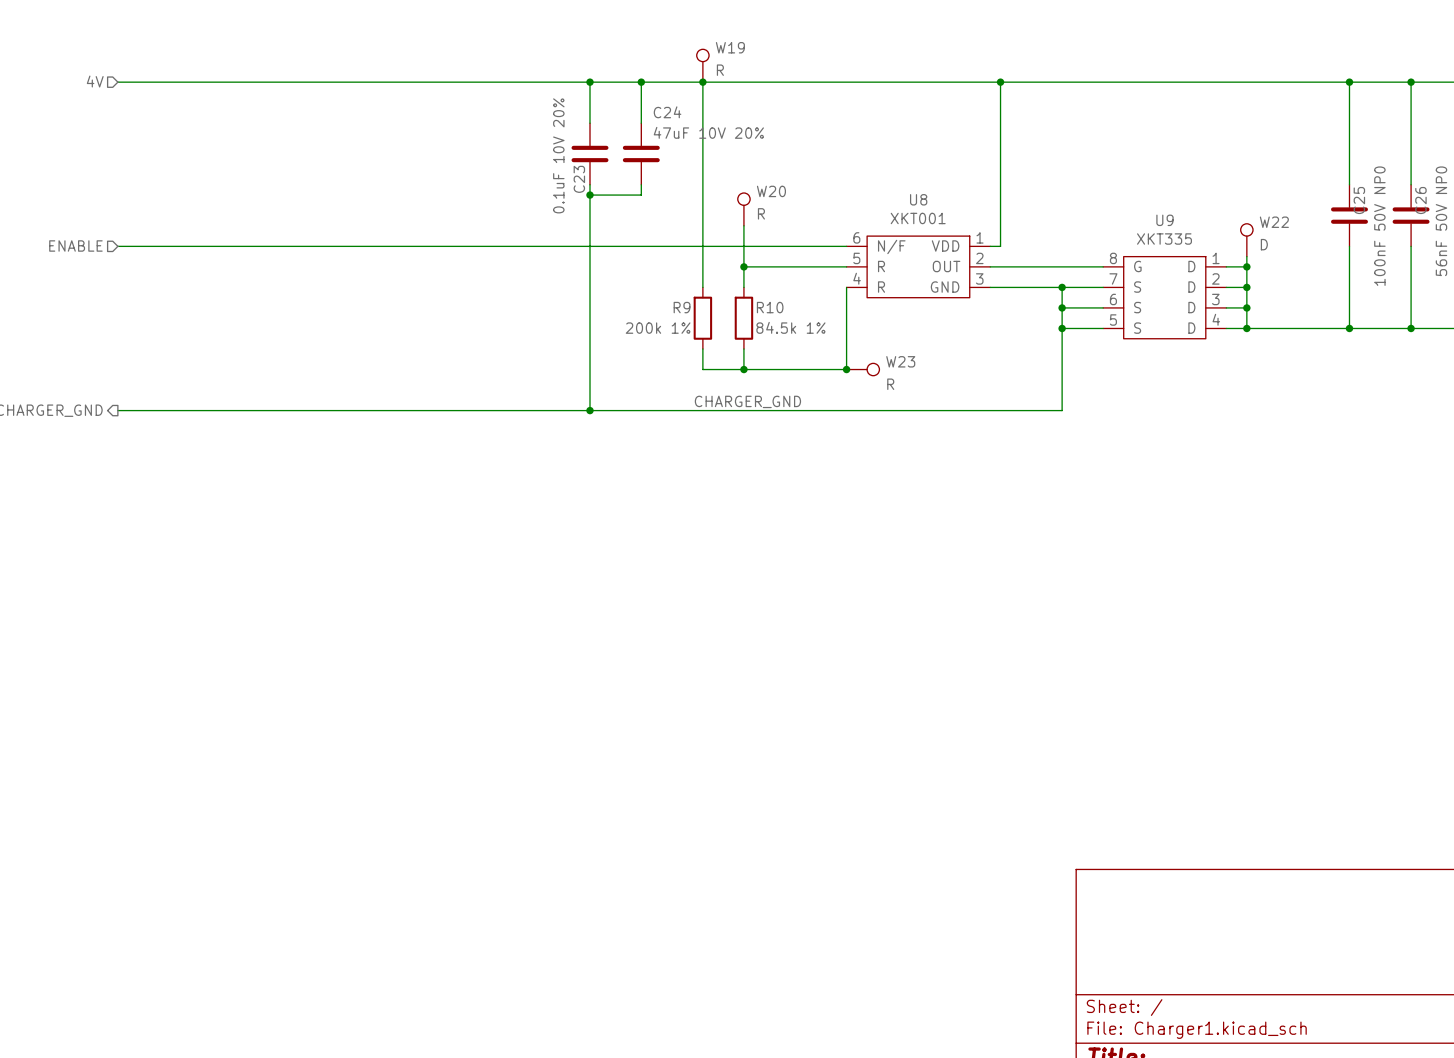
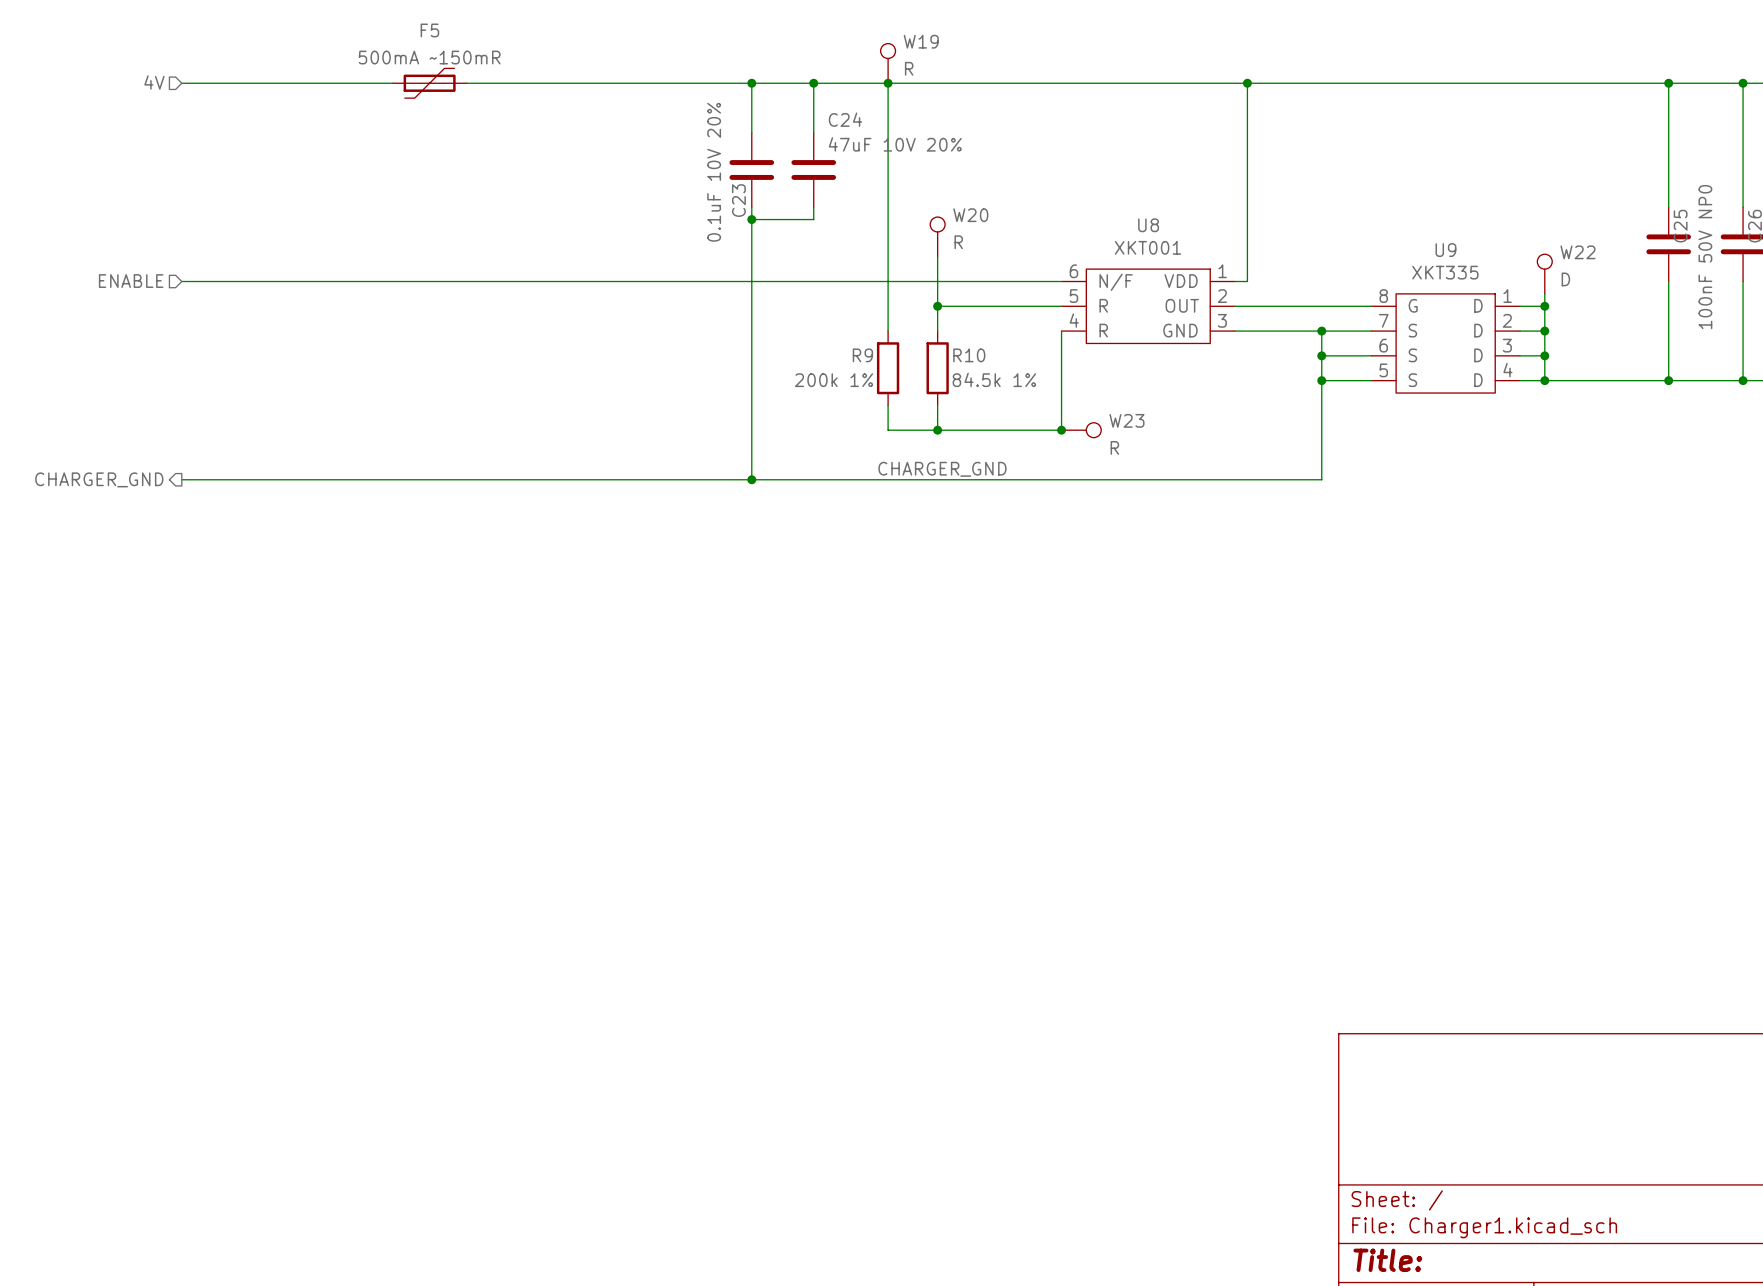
F5: none -> 500mA ~150mR (429, 83)

